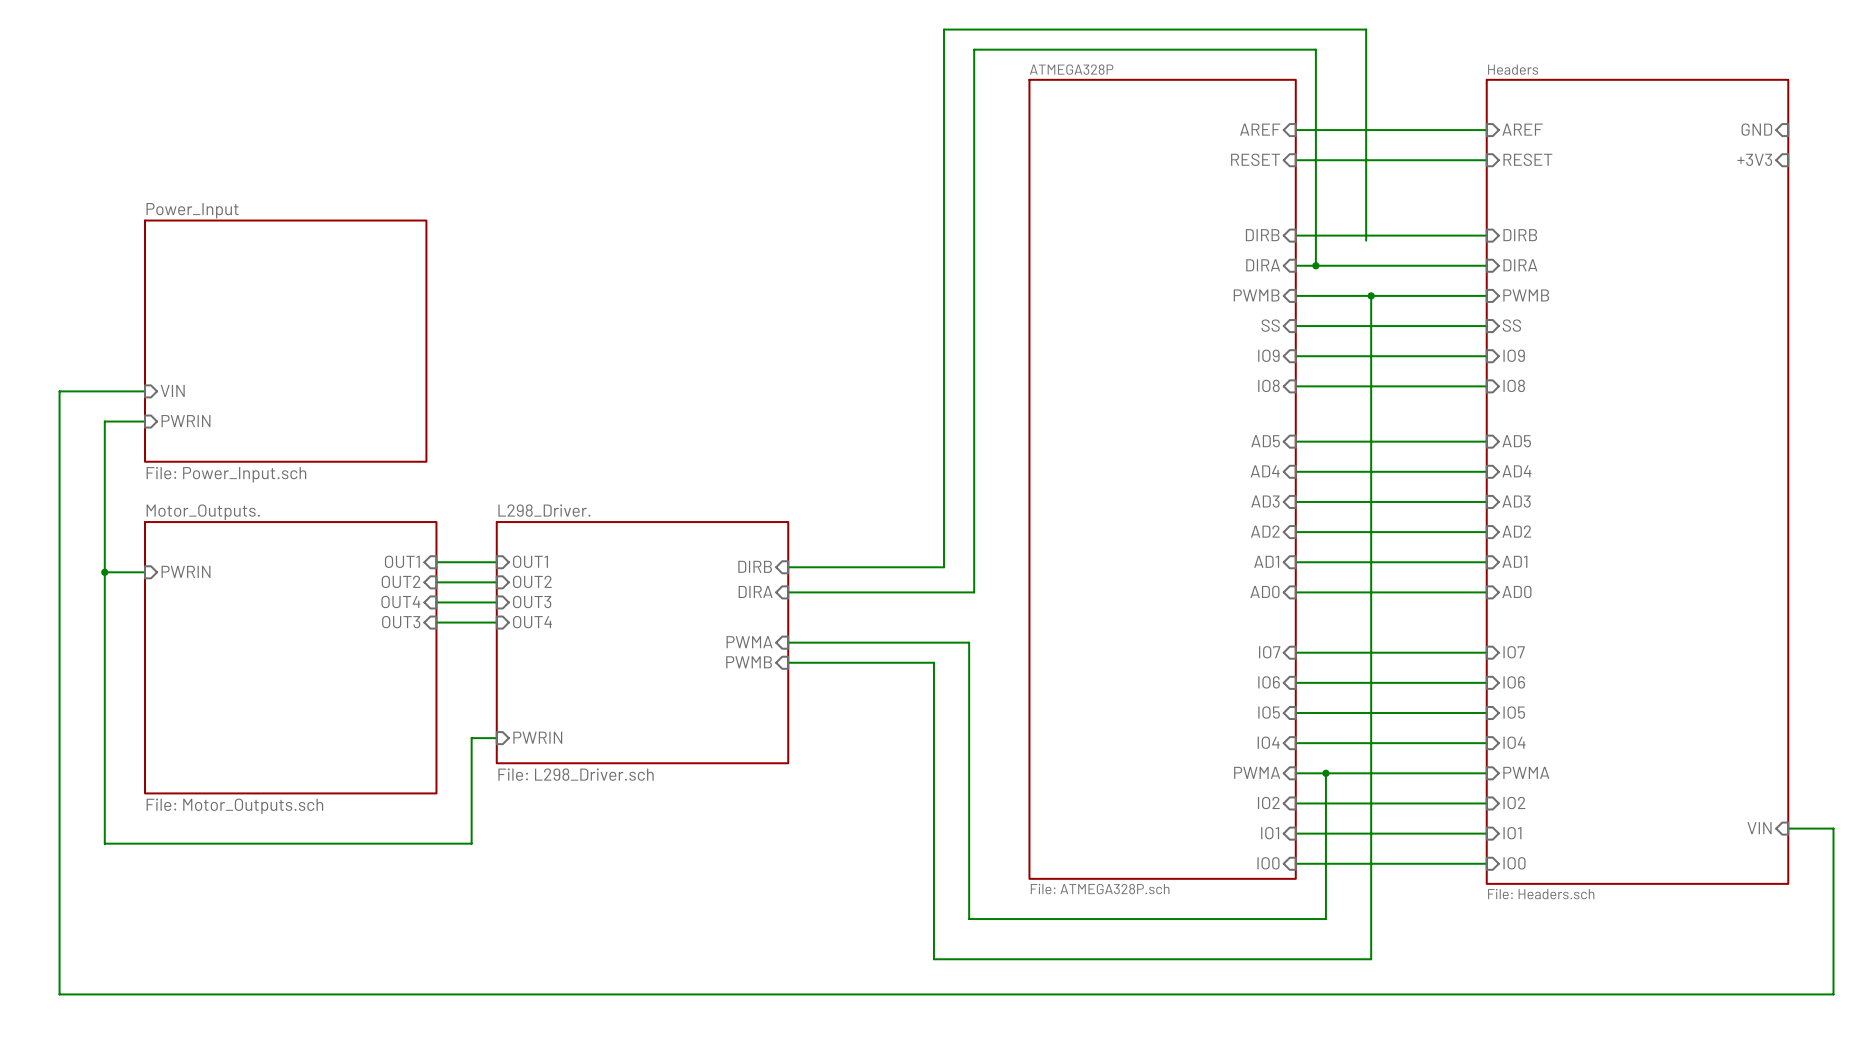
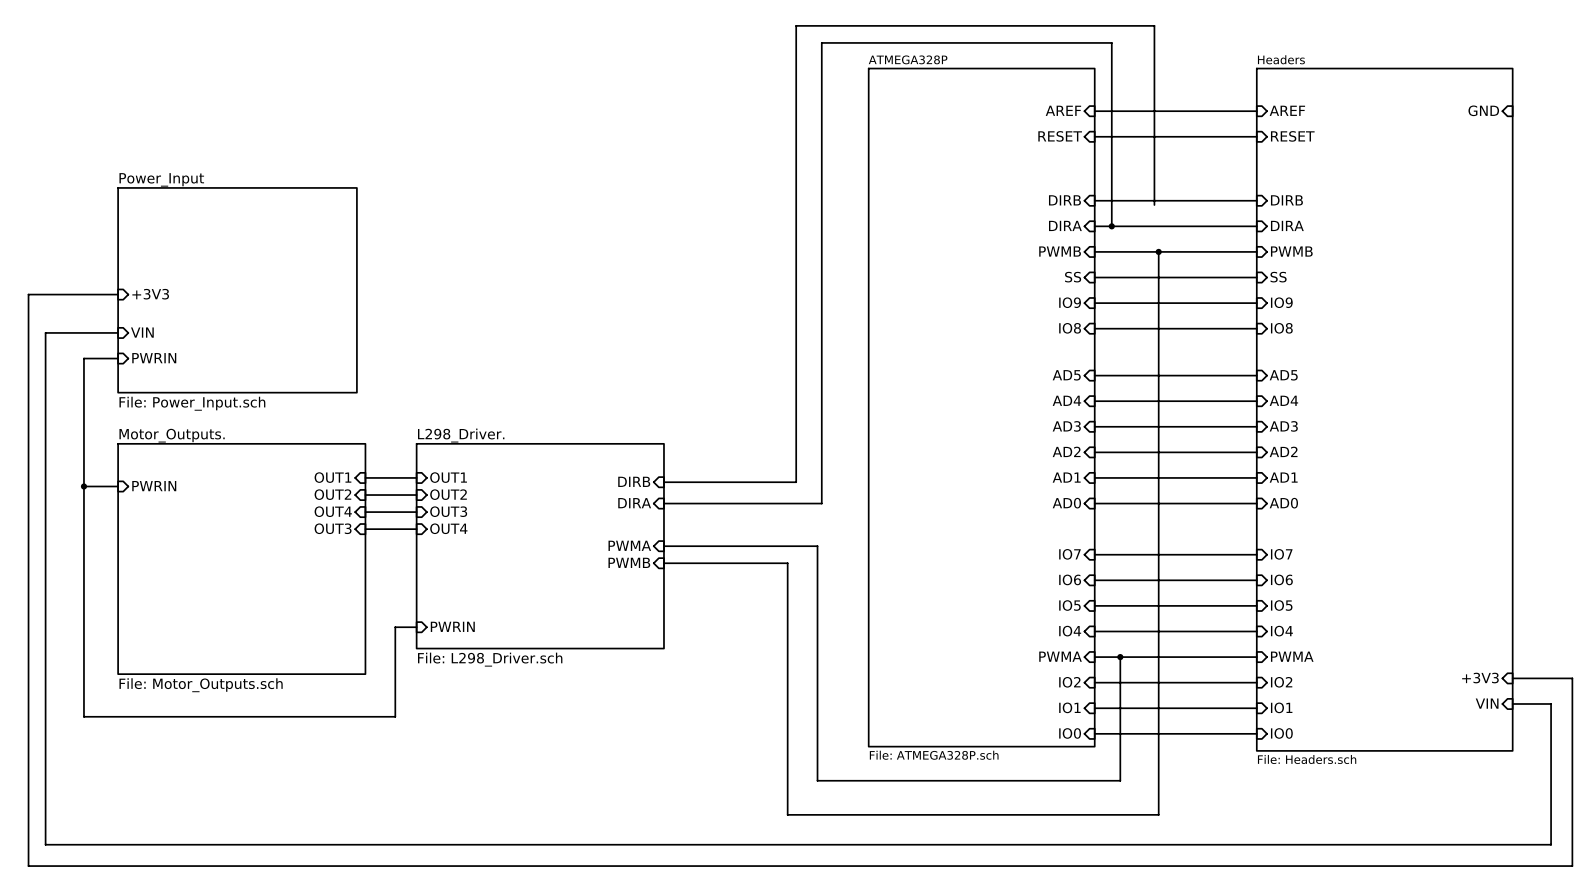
sheet pin: +3V3 (1754, 159) -> none
sheet pin: none -> +3V3 (150, 294)
wire: none -> (118, 294) (28, 294) (28, 866) (1572, 866) (1572, 678) (1512, 678)
sheet pin: none -> +3V3 (1480, 678)

